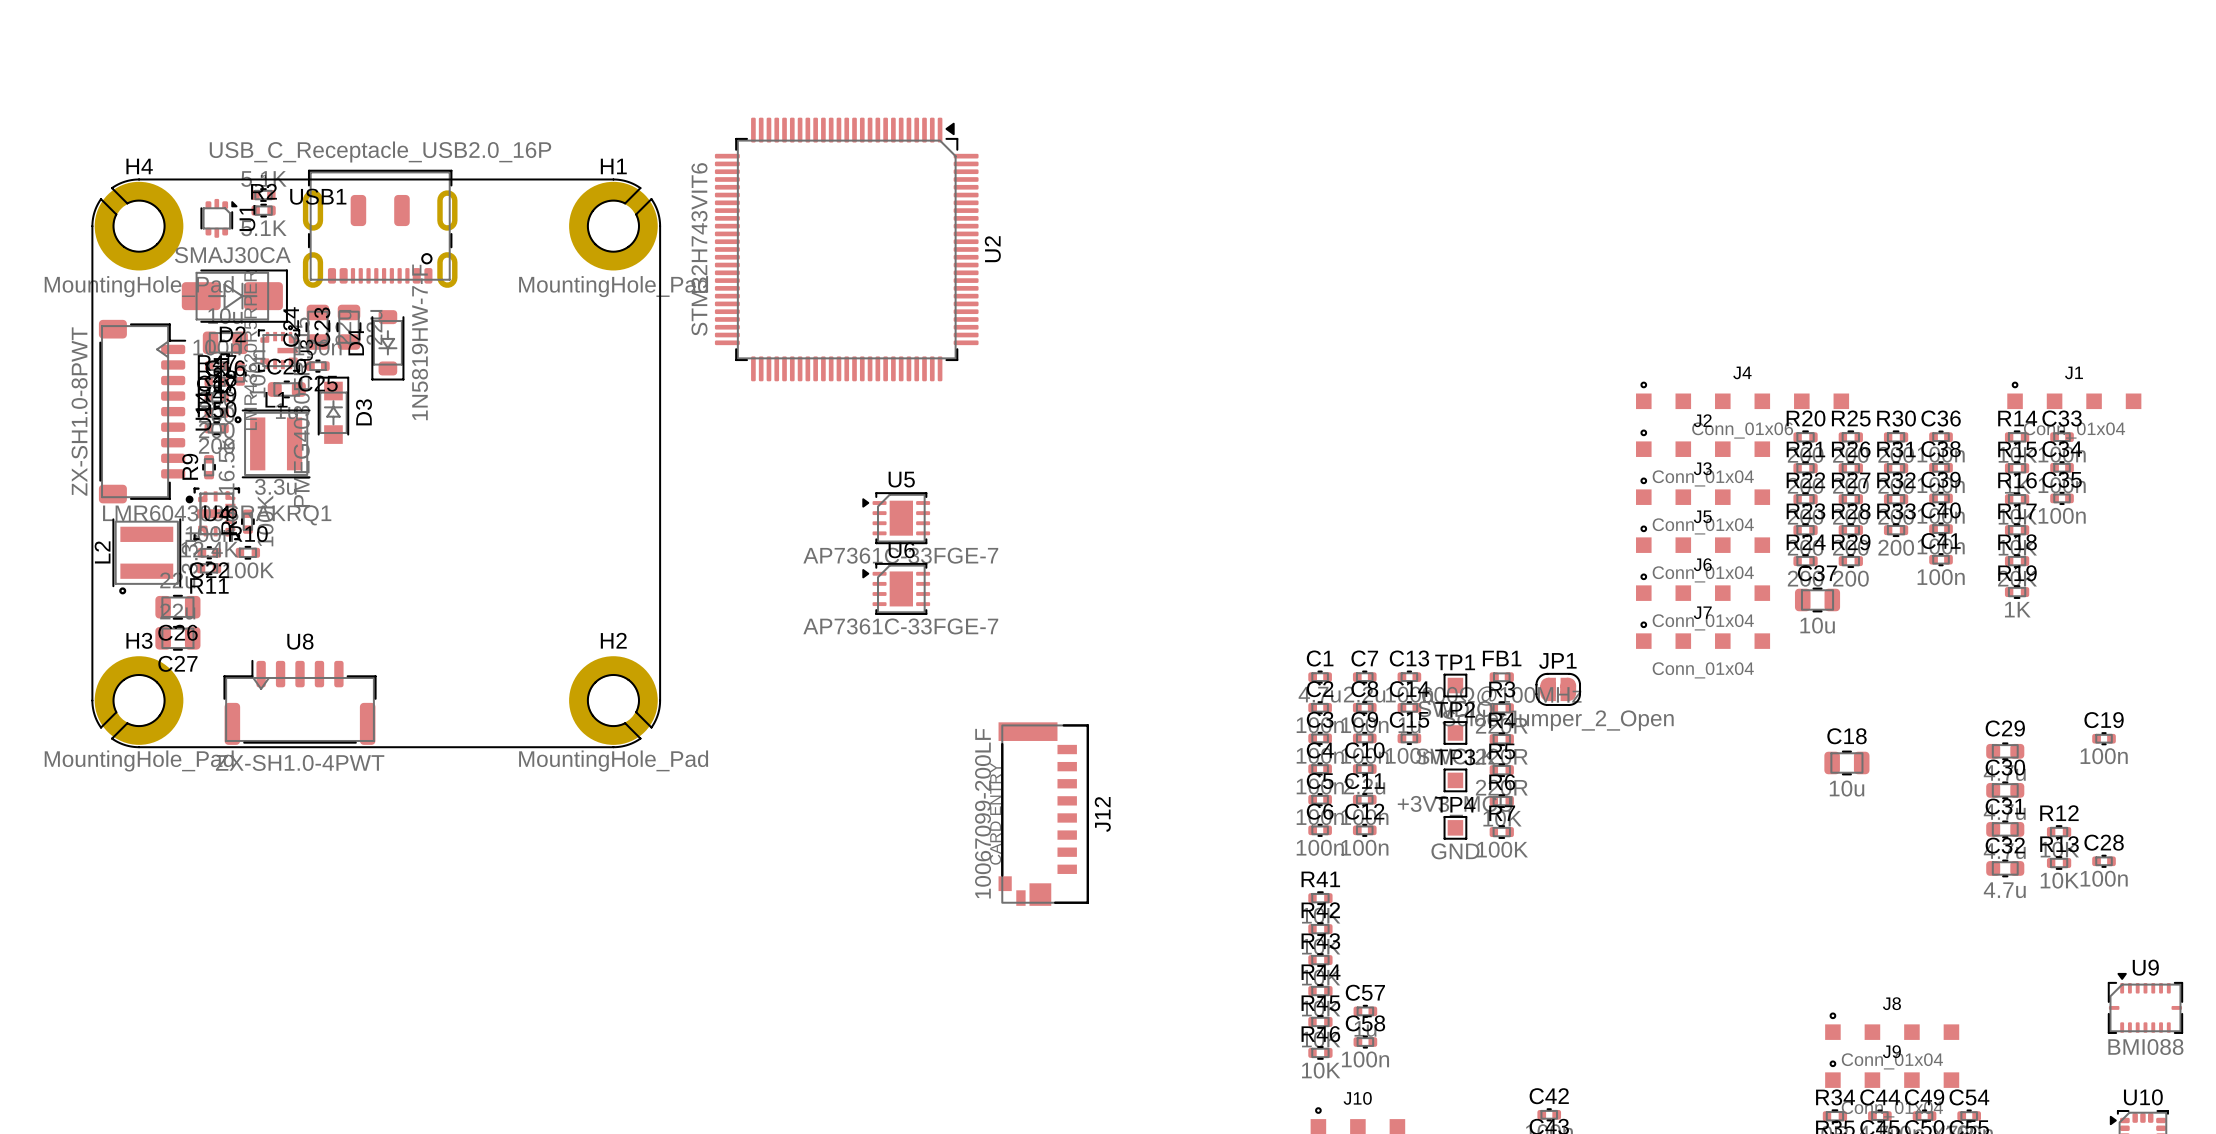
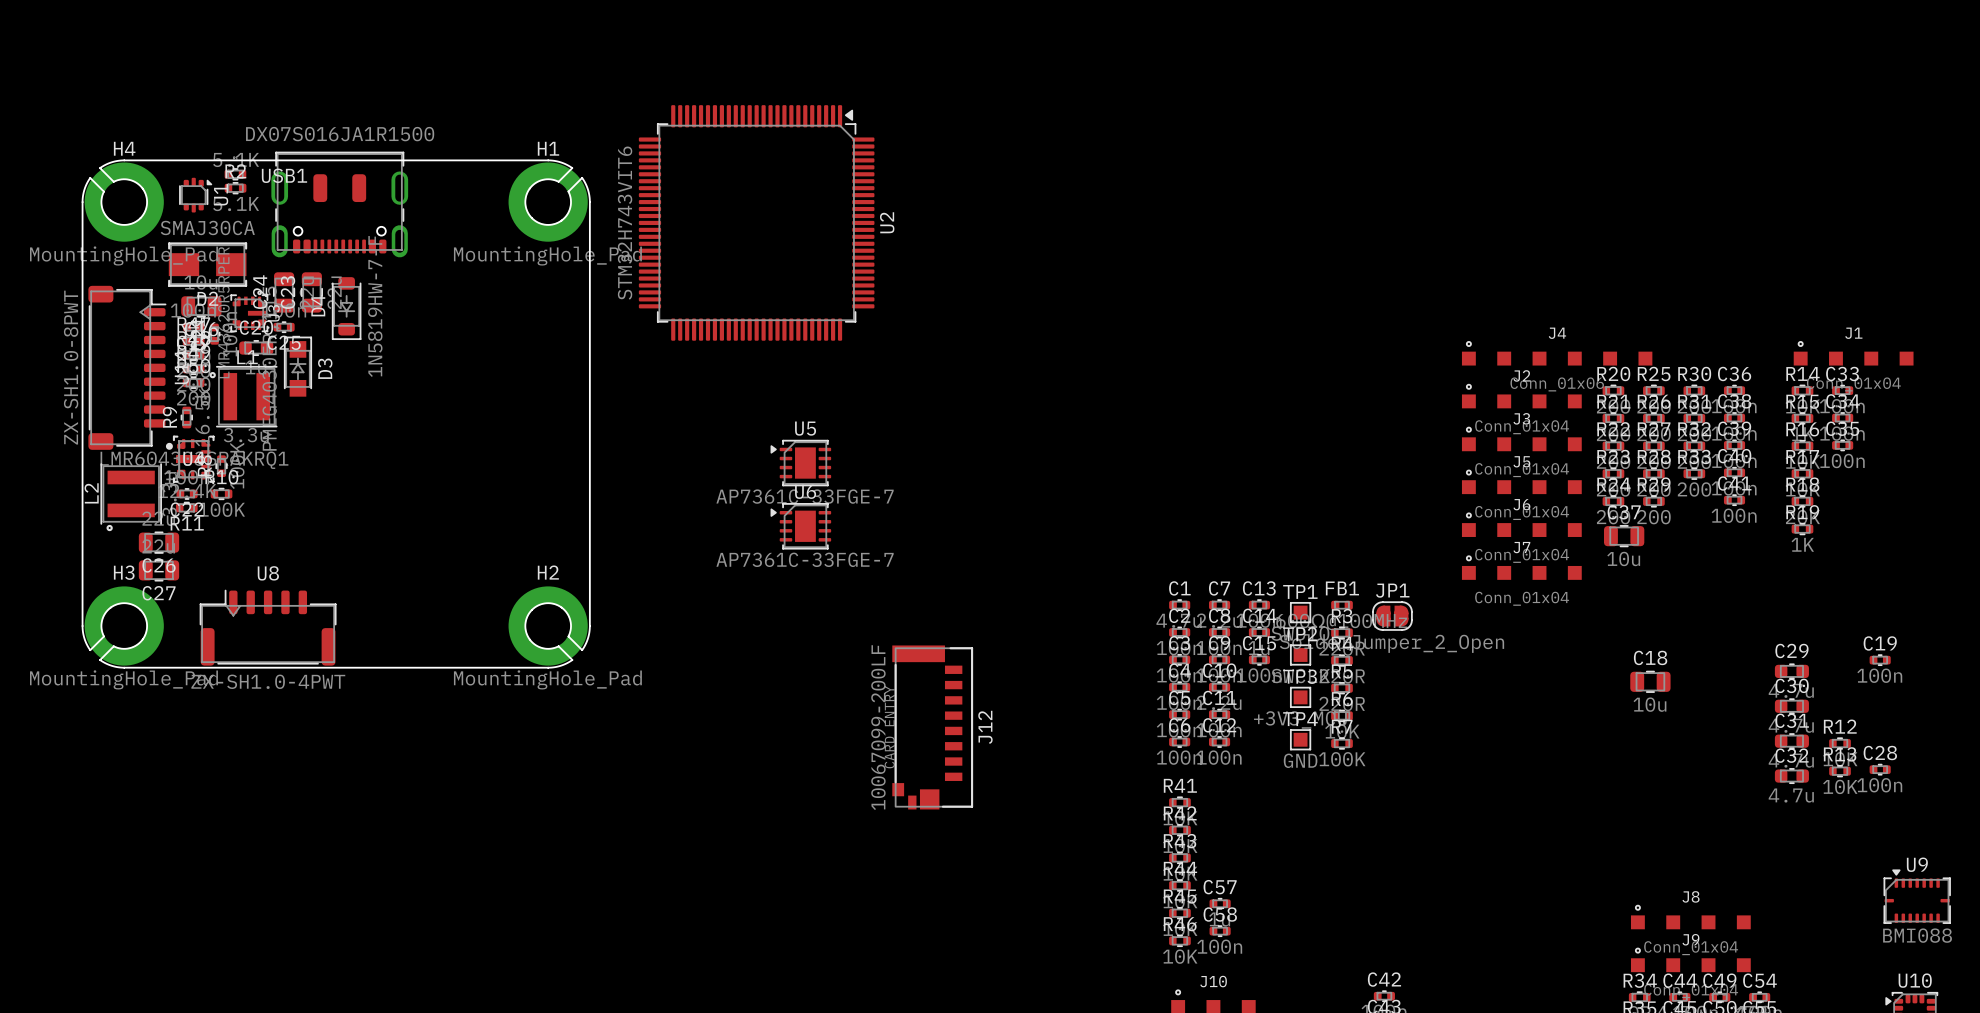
USB1 value: USB_C_Receptacle_USB2.0_16P (380, 151) -> DX07S016JA1R1500 (340, 134)
USB1 footprint: [302, 169, 458, 288] -> [271, 151, 409, 258]
D2 footprint: [181, 269, 288, 323] -> [168, 242, 248, 287]

